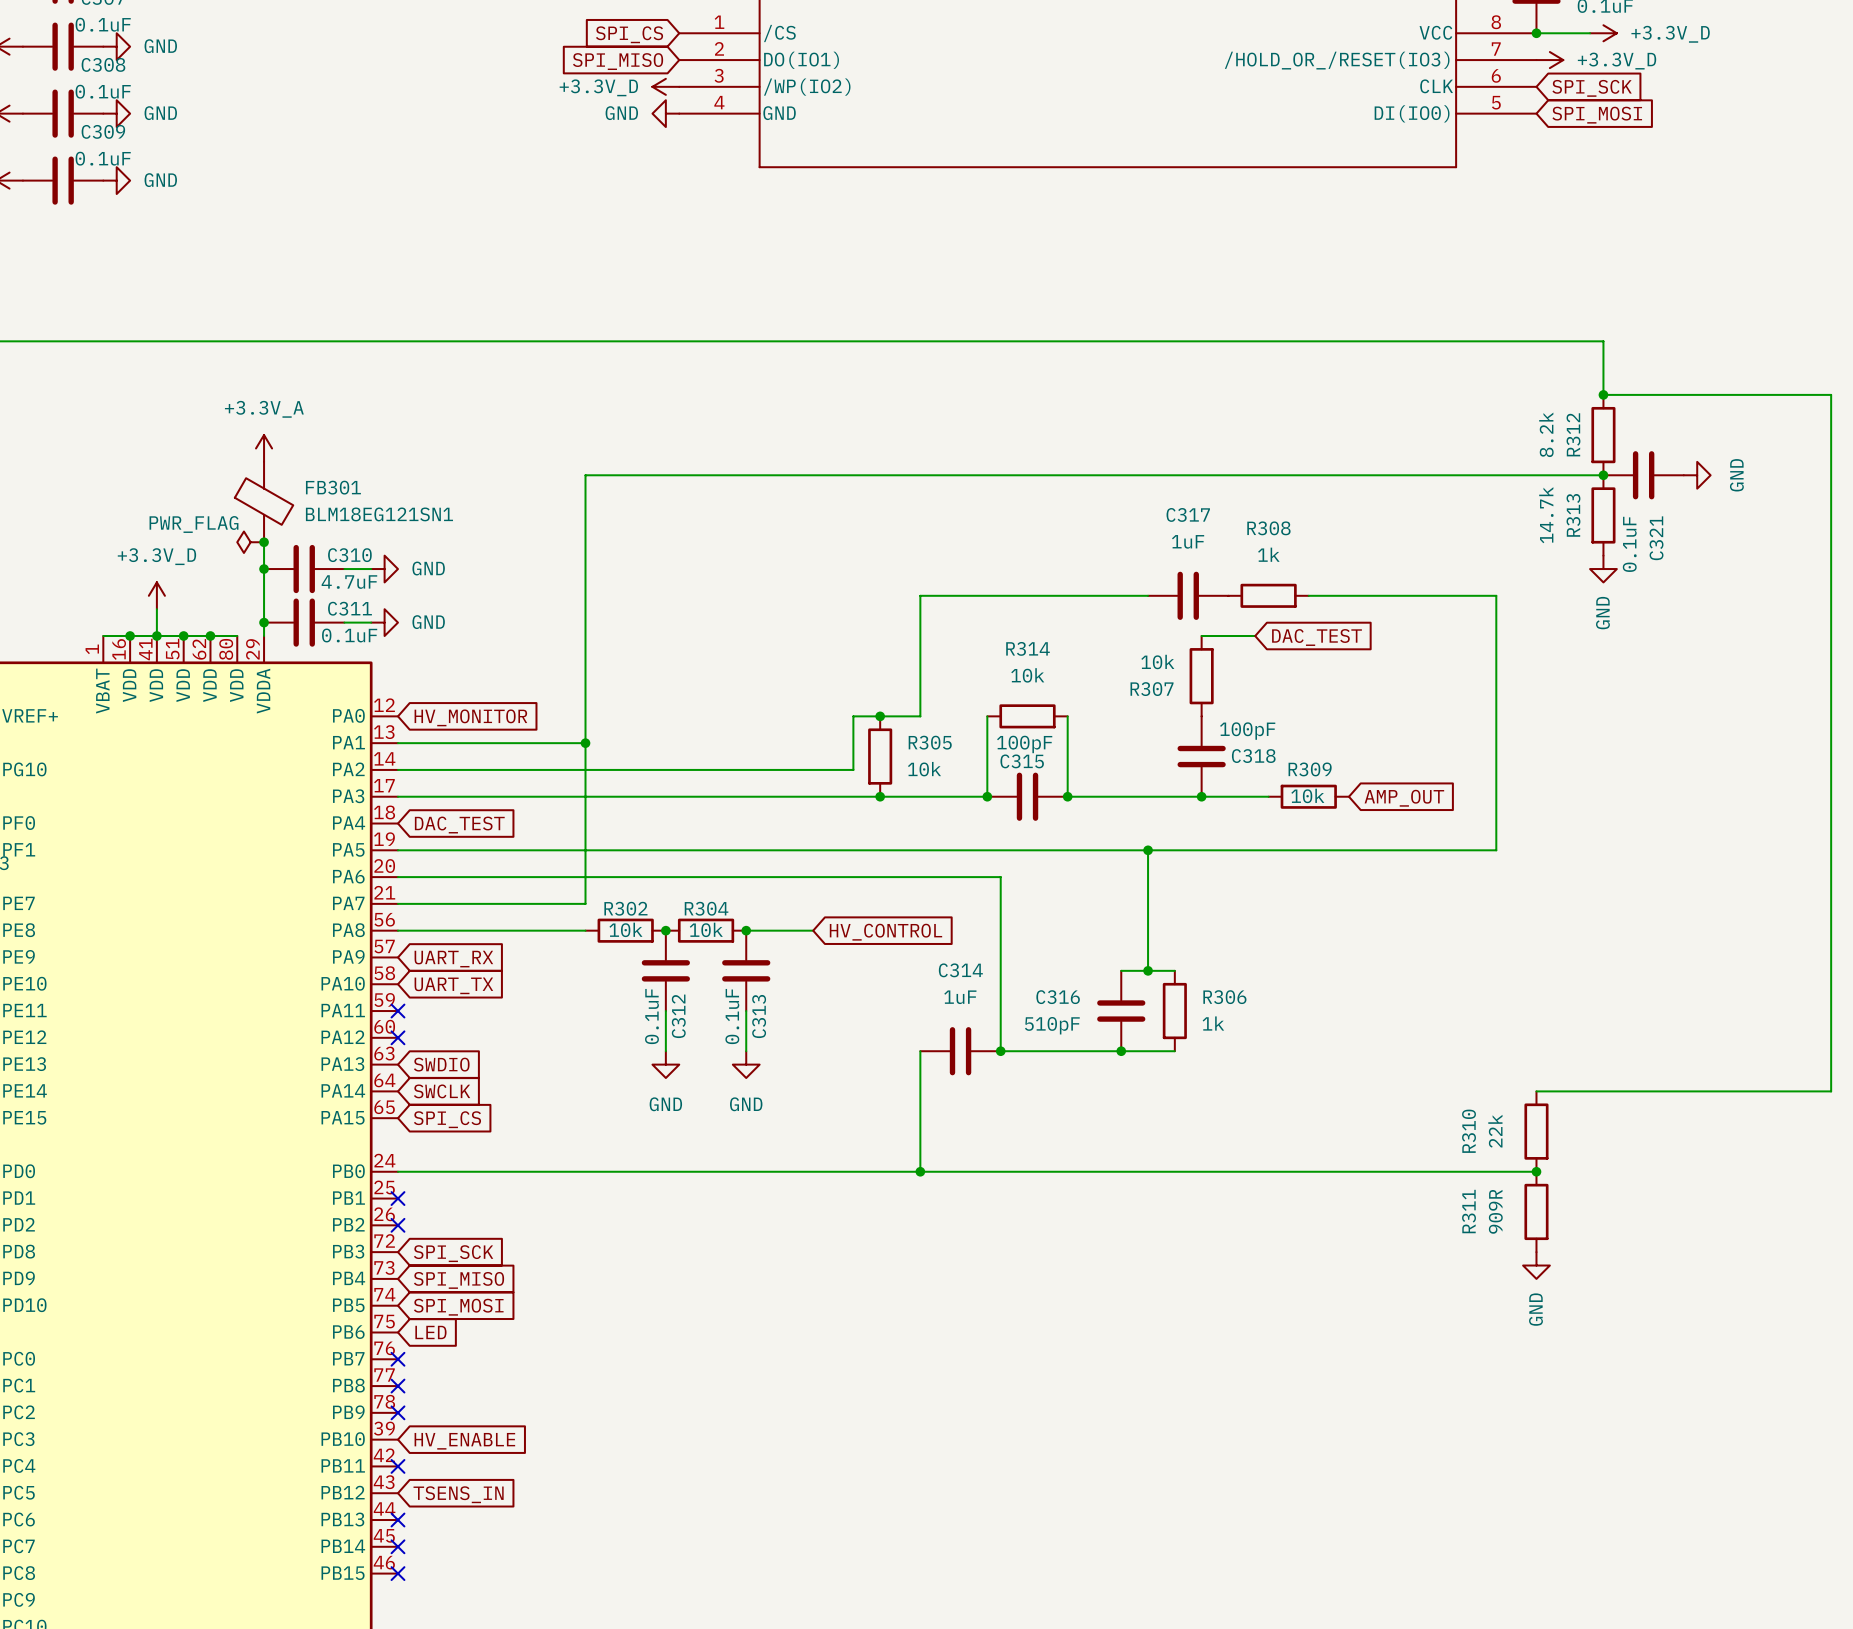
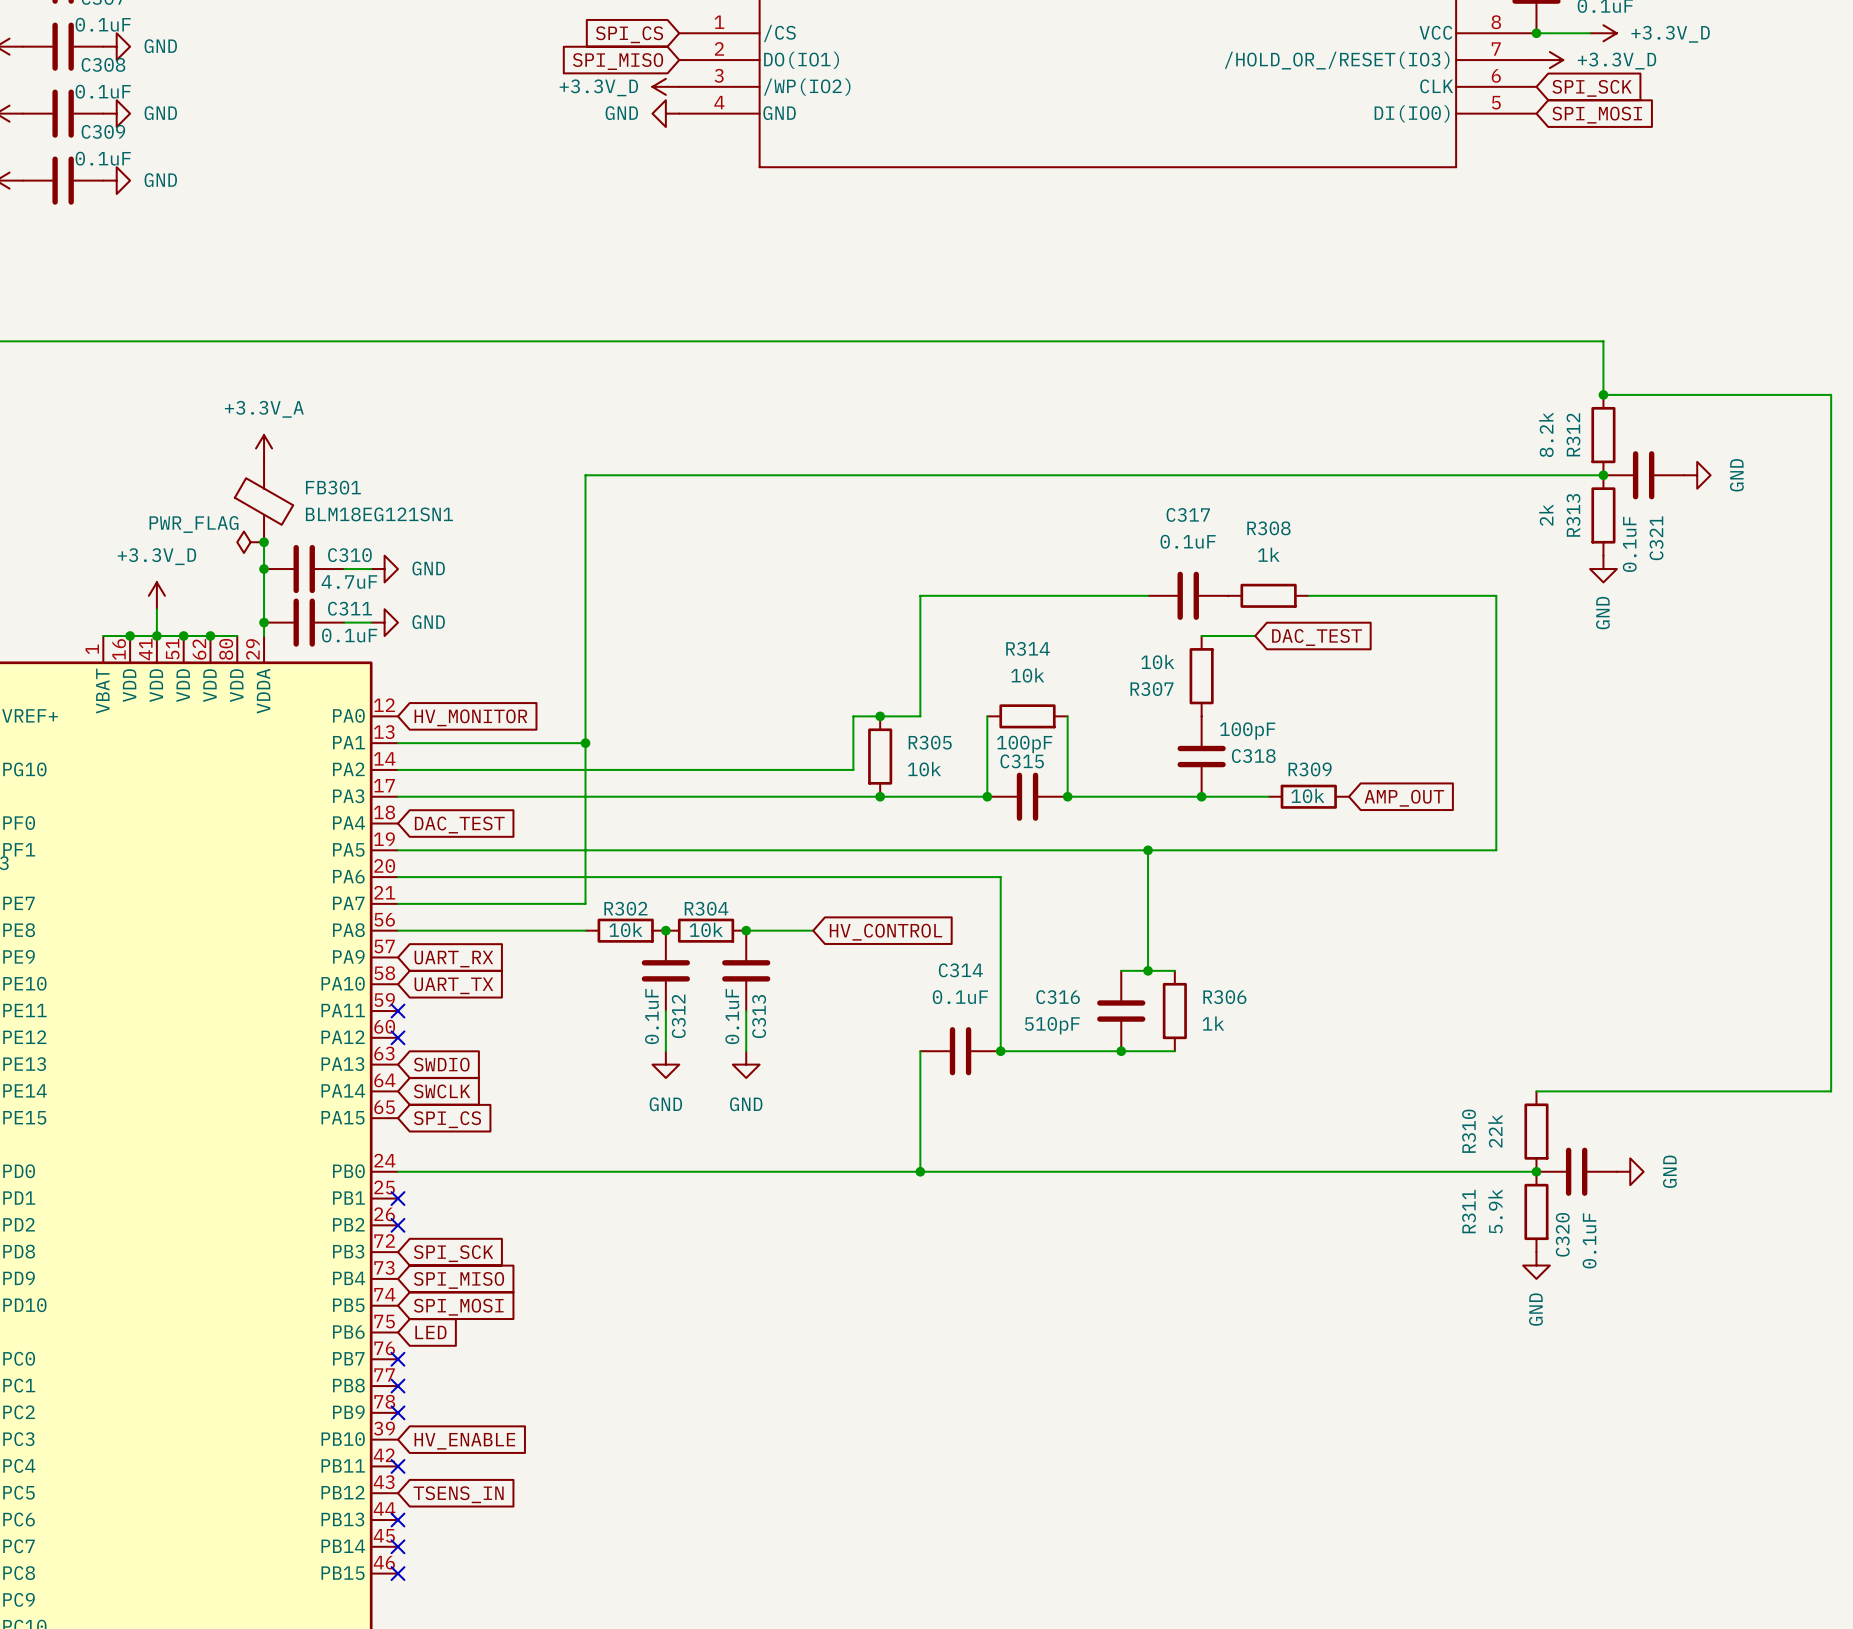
R313 value: 14.7k (1546, 515) -> 2k (1546, 515)
C317 value: 1uF (1188, 541) -> 0.1uF (1188, 541)
C314 value: 1uF (960, 997) -> 0.1uF (960, 997)
C320: none -> 0.1uF (1576, 1171)
power symbol: none -> GND (1630, 1171)
R311 value: 909R (1495, 1211) -> 5.9k (1495, 1211)

